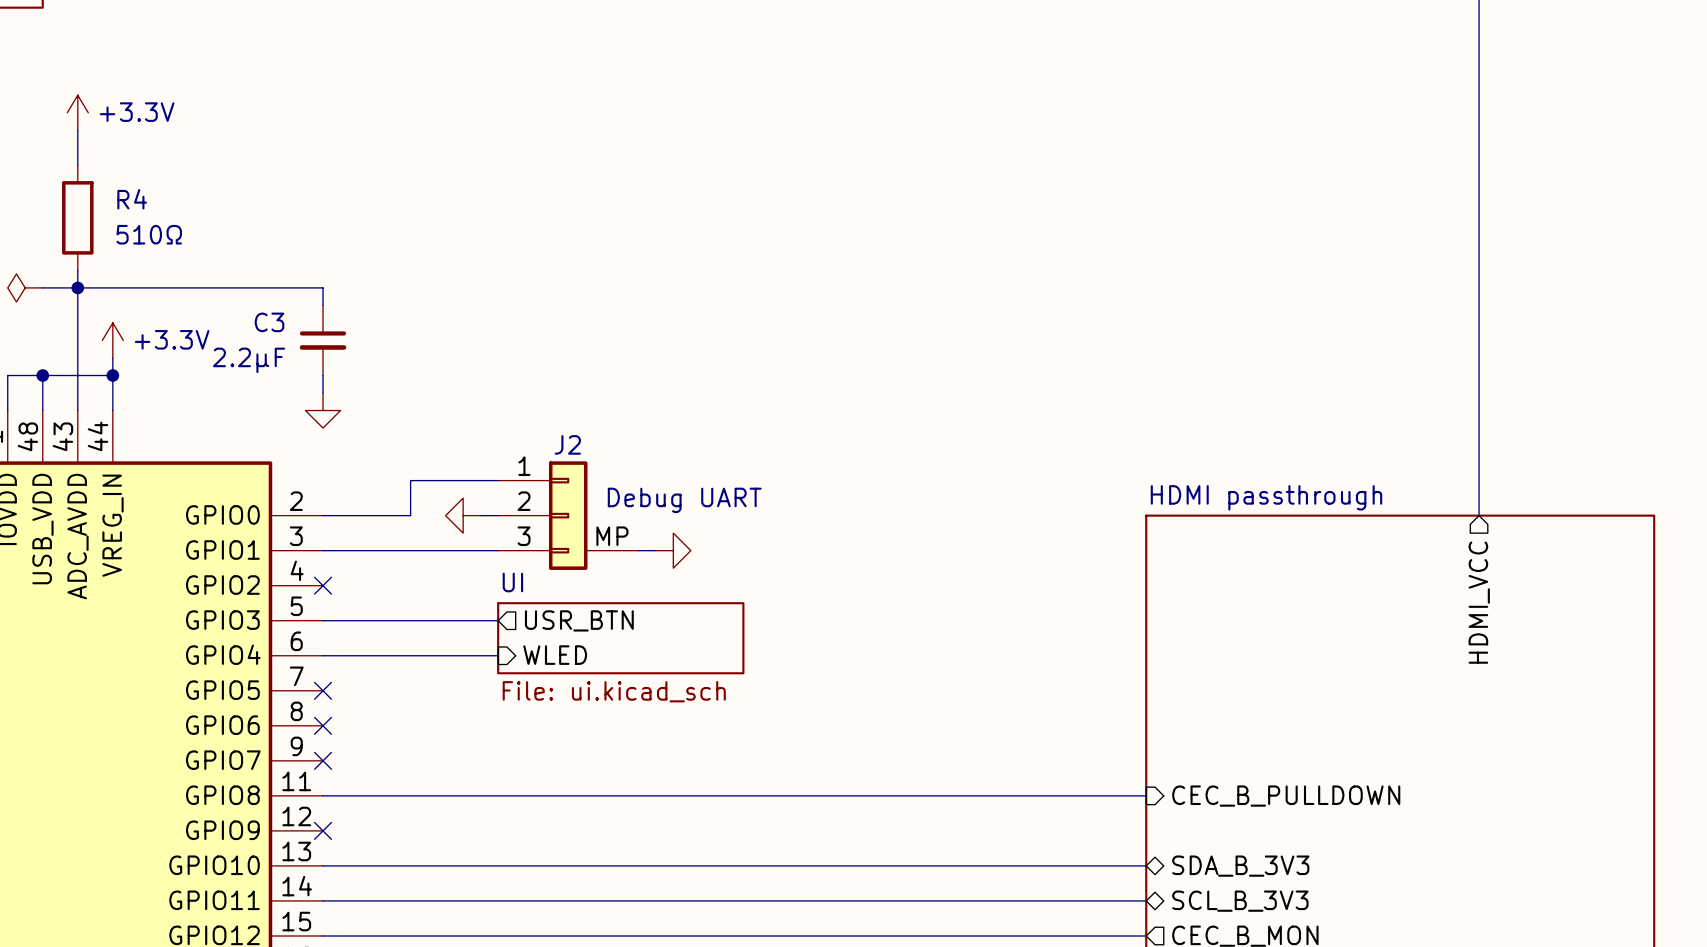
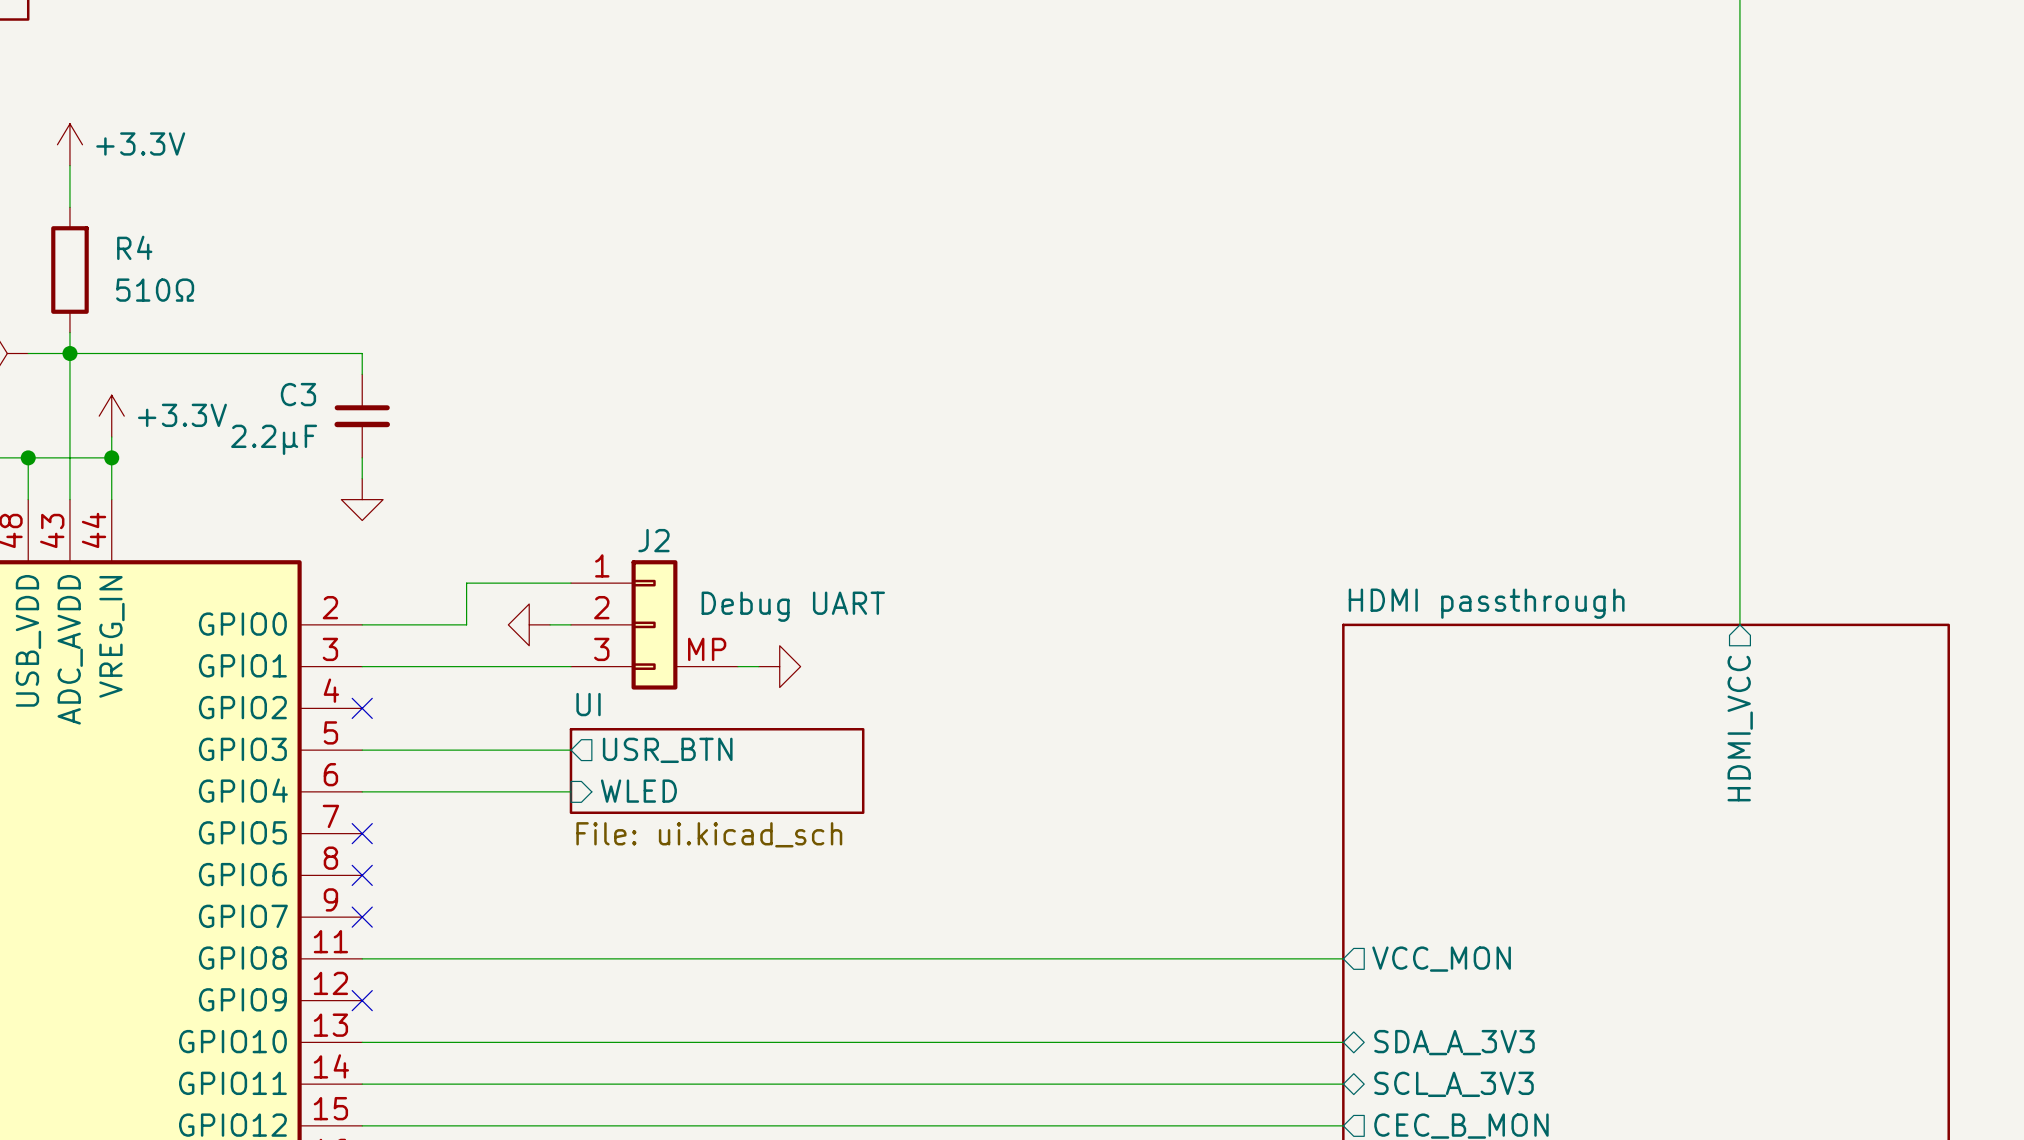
sheet pin shape: input (1286, 796) -> output (1441, 959)
sheet pin: CEC_B_PULLDOWN (1286, 796) -> VCC_MON (1441, 959)
sheet pin: SDA_B_3V3 (1240, 866) -> SDA_A_3V3 (1454, 1042)
sheet pin: SCL_B_3V3 (1240, 901) -> SCL_A_3V3 (1454, 1084)

